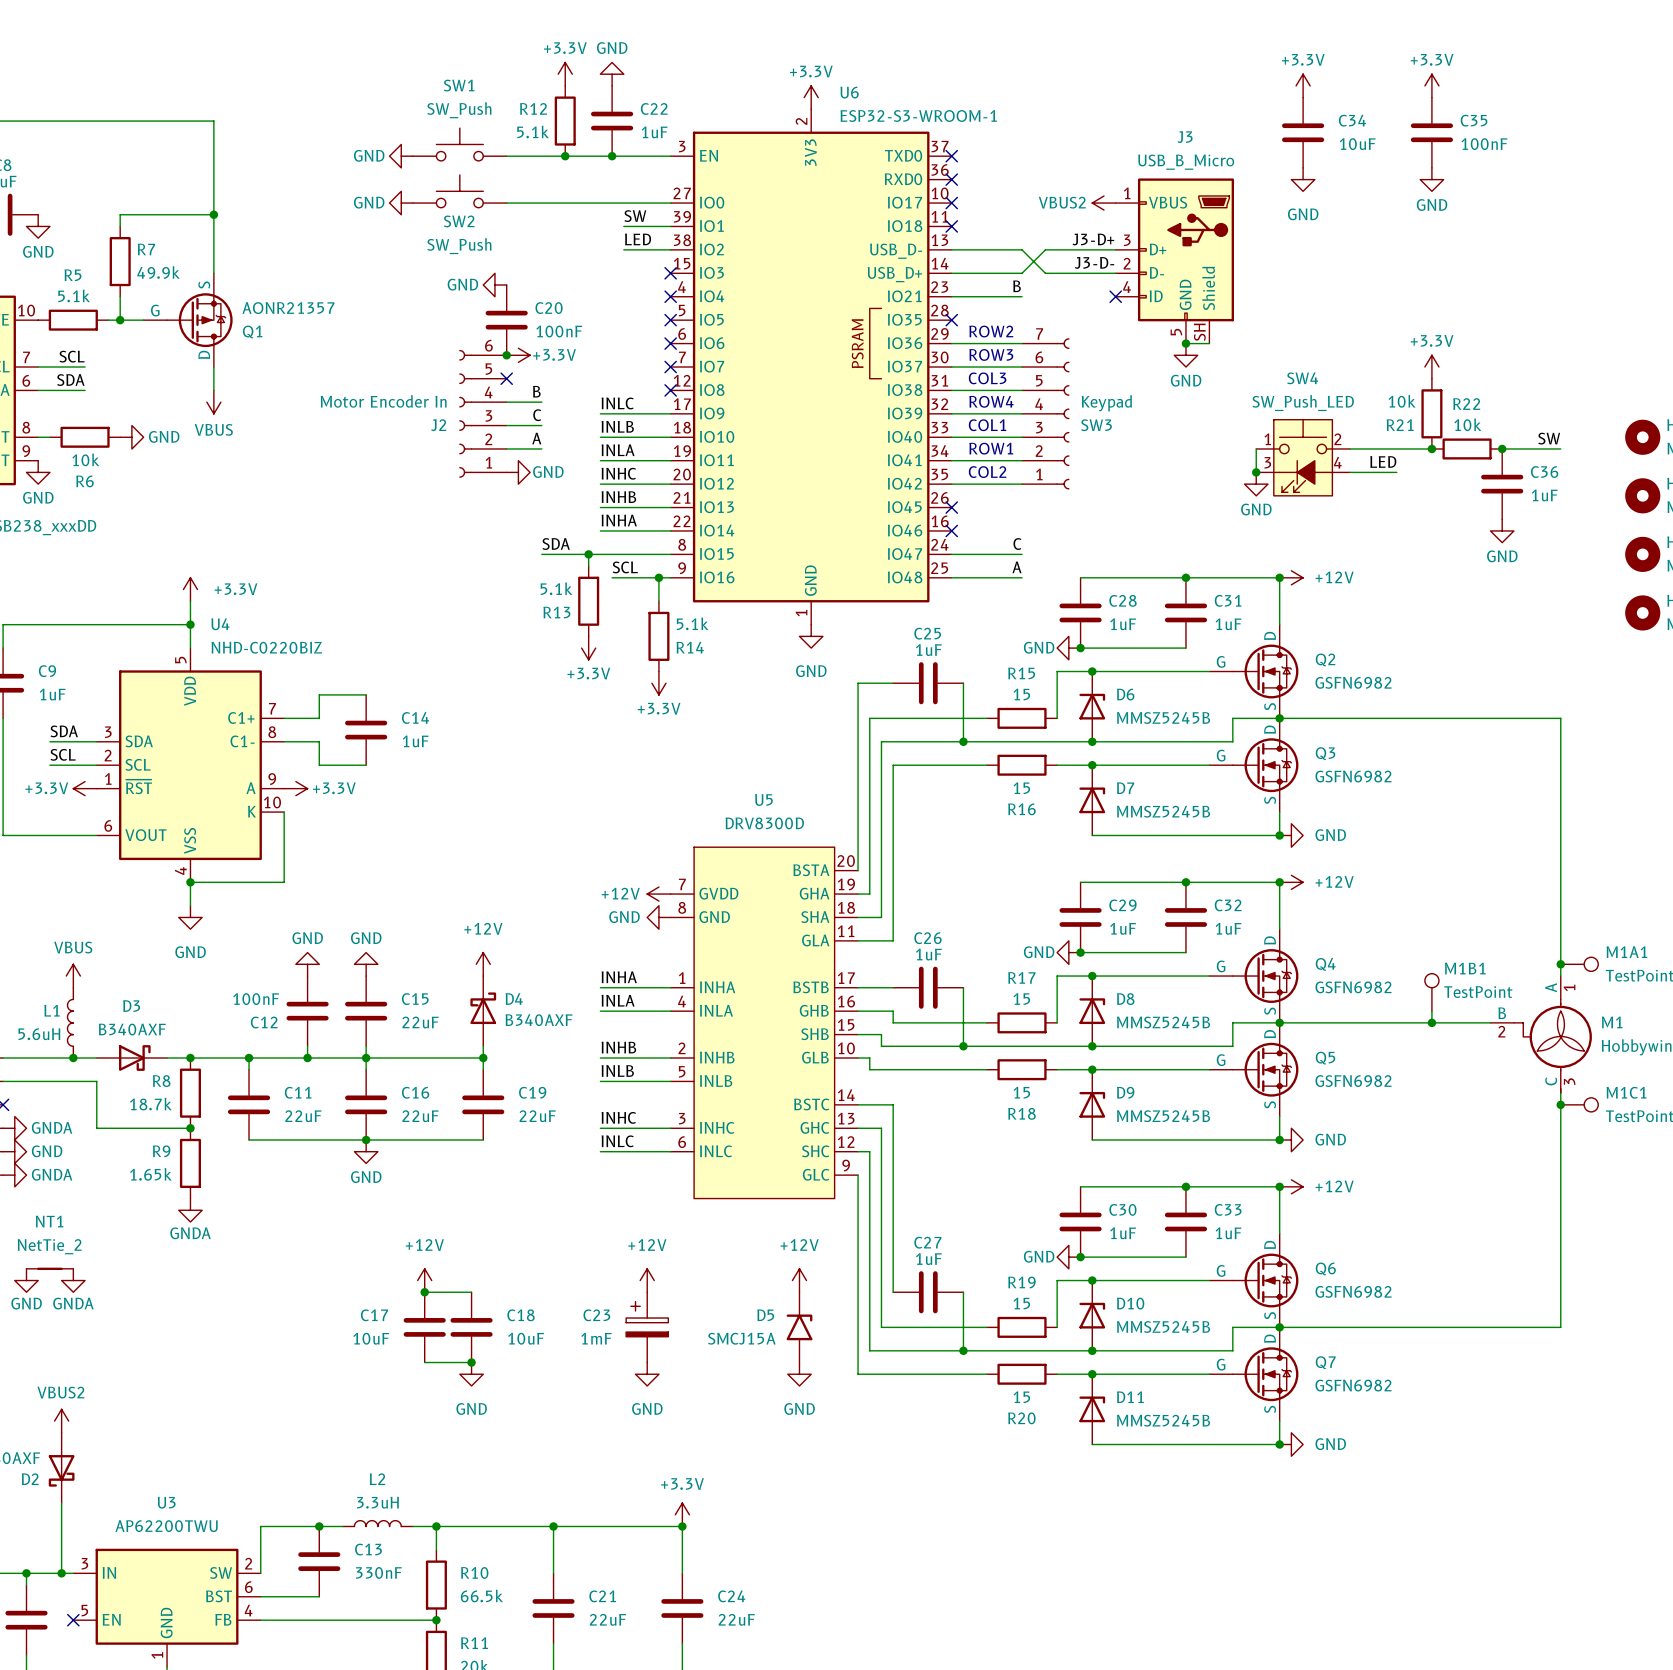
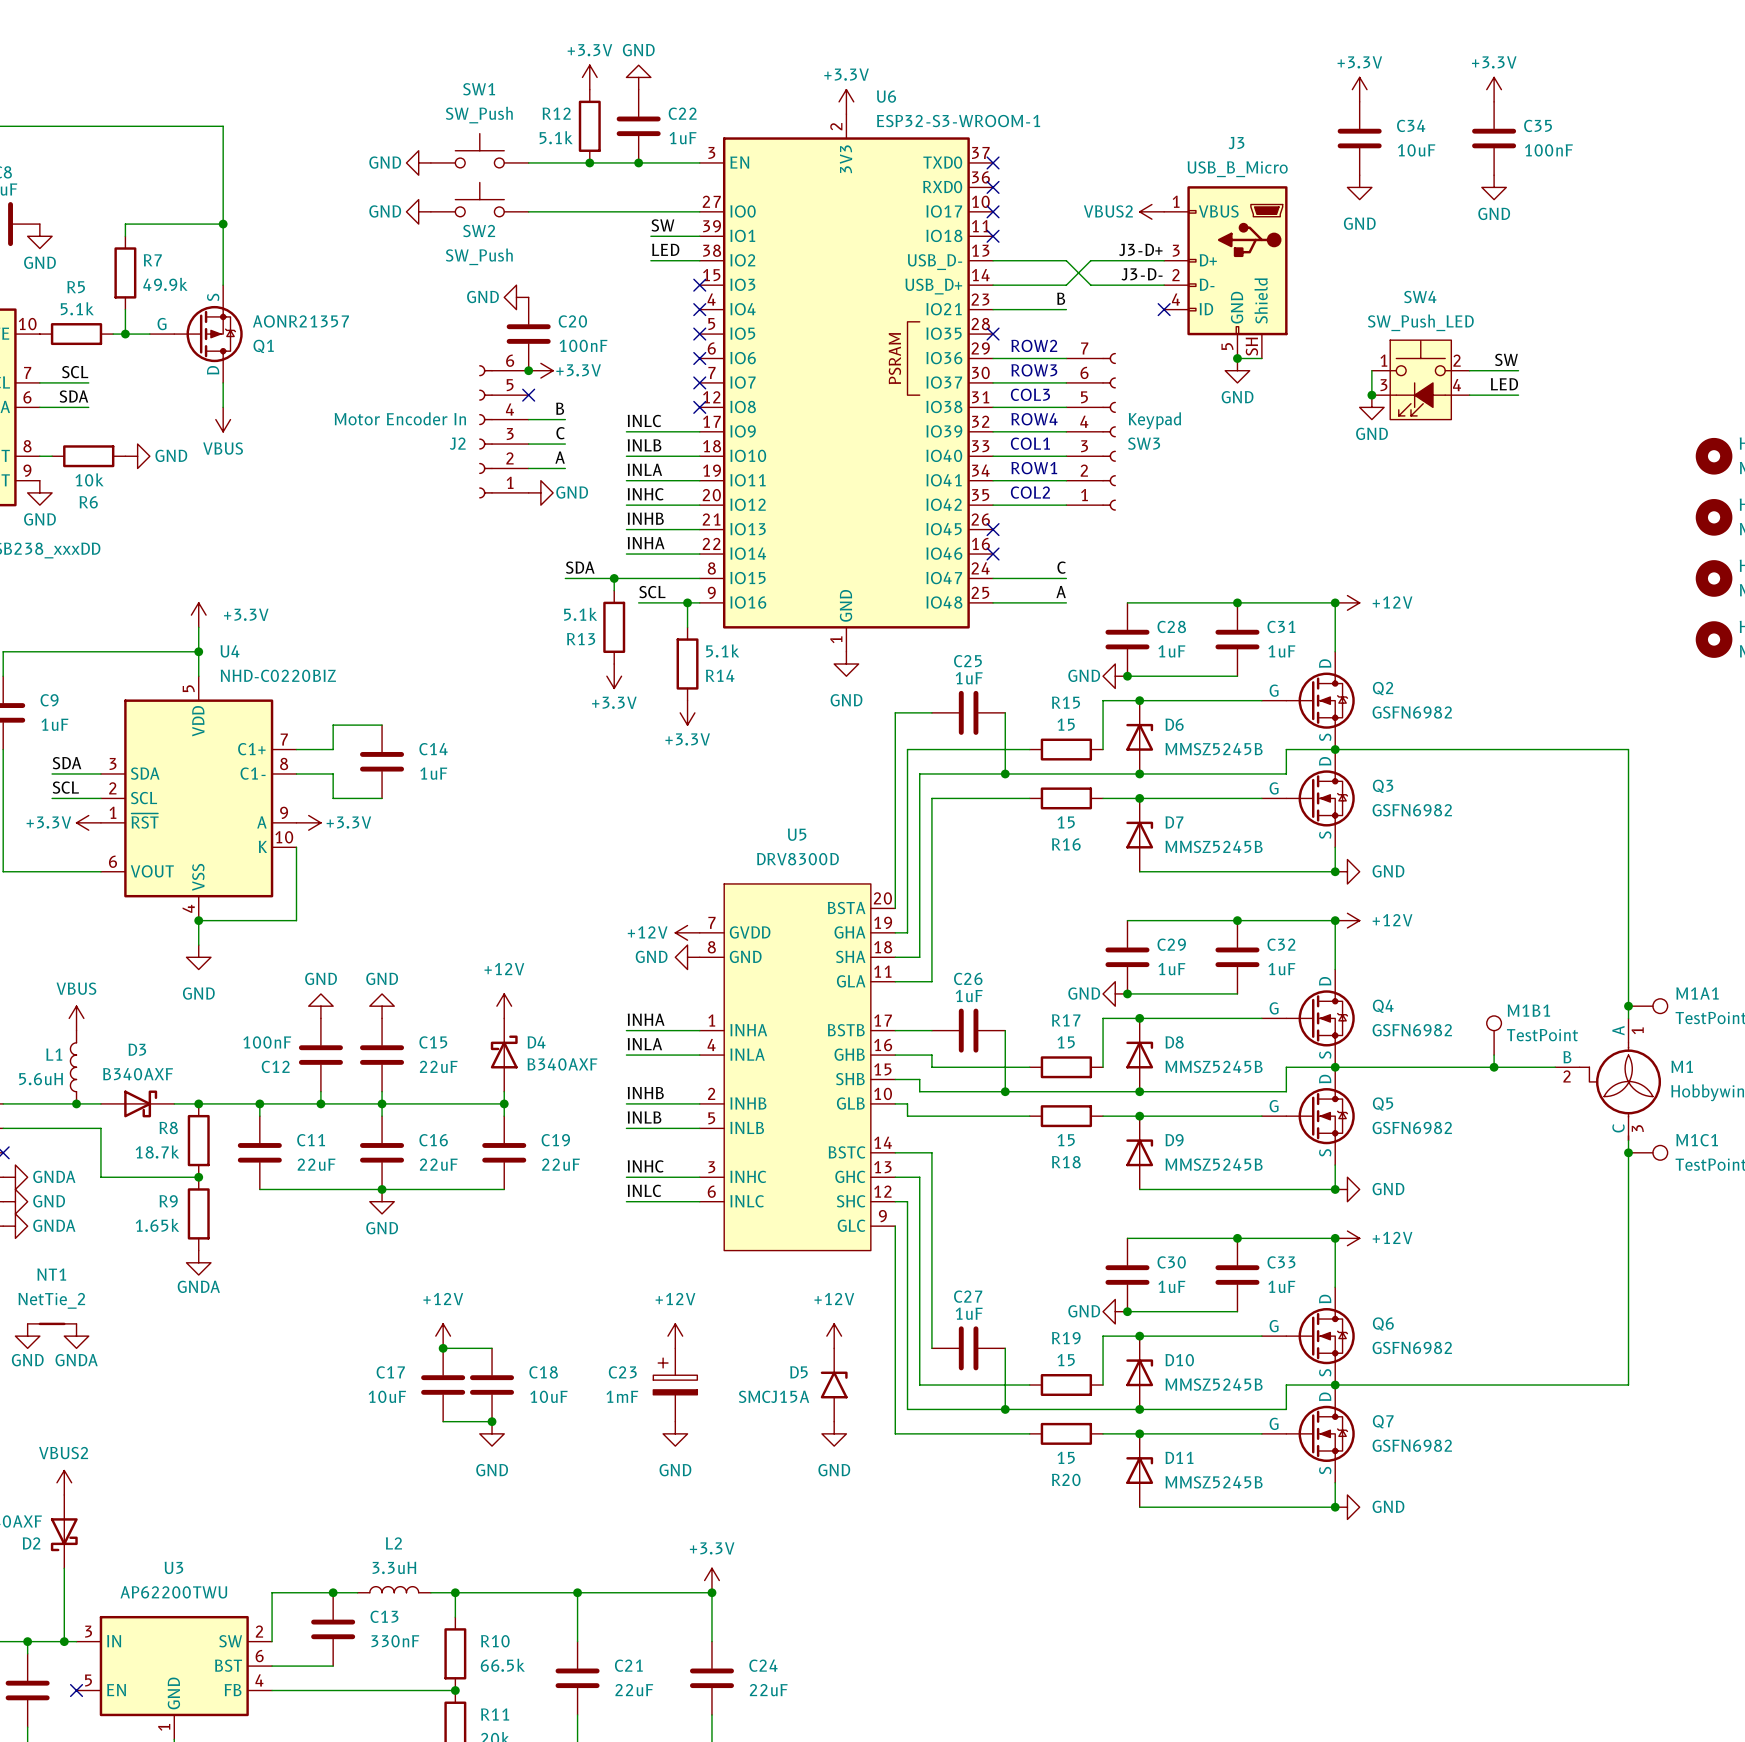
wire: none -> (1469, 370) (1518, 370)
power symbol: +3.3V (1431, 367) -> none
junction: none -> (1371, 395)
R21: 10k (1431, 413) -> none
label position: SW (1549, 438) -> SW (1506, 359)
wire: (1256, 448) (1256, 472) -> (1371, 370) (1371, 395)
wire: (1349, 448) (1431, 448) -> none
junction: (1431, 448) -> none
R22: 10k (1467, 448) -> none
wire: (1502, 448) (1560, 448) -> none
junction: (1502, 448) -> none
SW4 position: (1303, 457) -> (1420, 379)
label position: LED (1383, 461) -> LED (1504, 384)
junction: (1256, 472) -> none
wire: (1349, 472) (1396, 472) -> (1469, 395) (1518, 395)
power symbol position: GND (1256, 484) -> GND (1371, 407)
C36: 1uF (1502, 484) -> none
power symbol: GND (1502, 530) -> none

